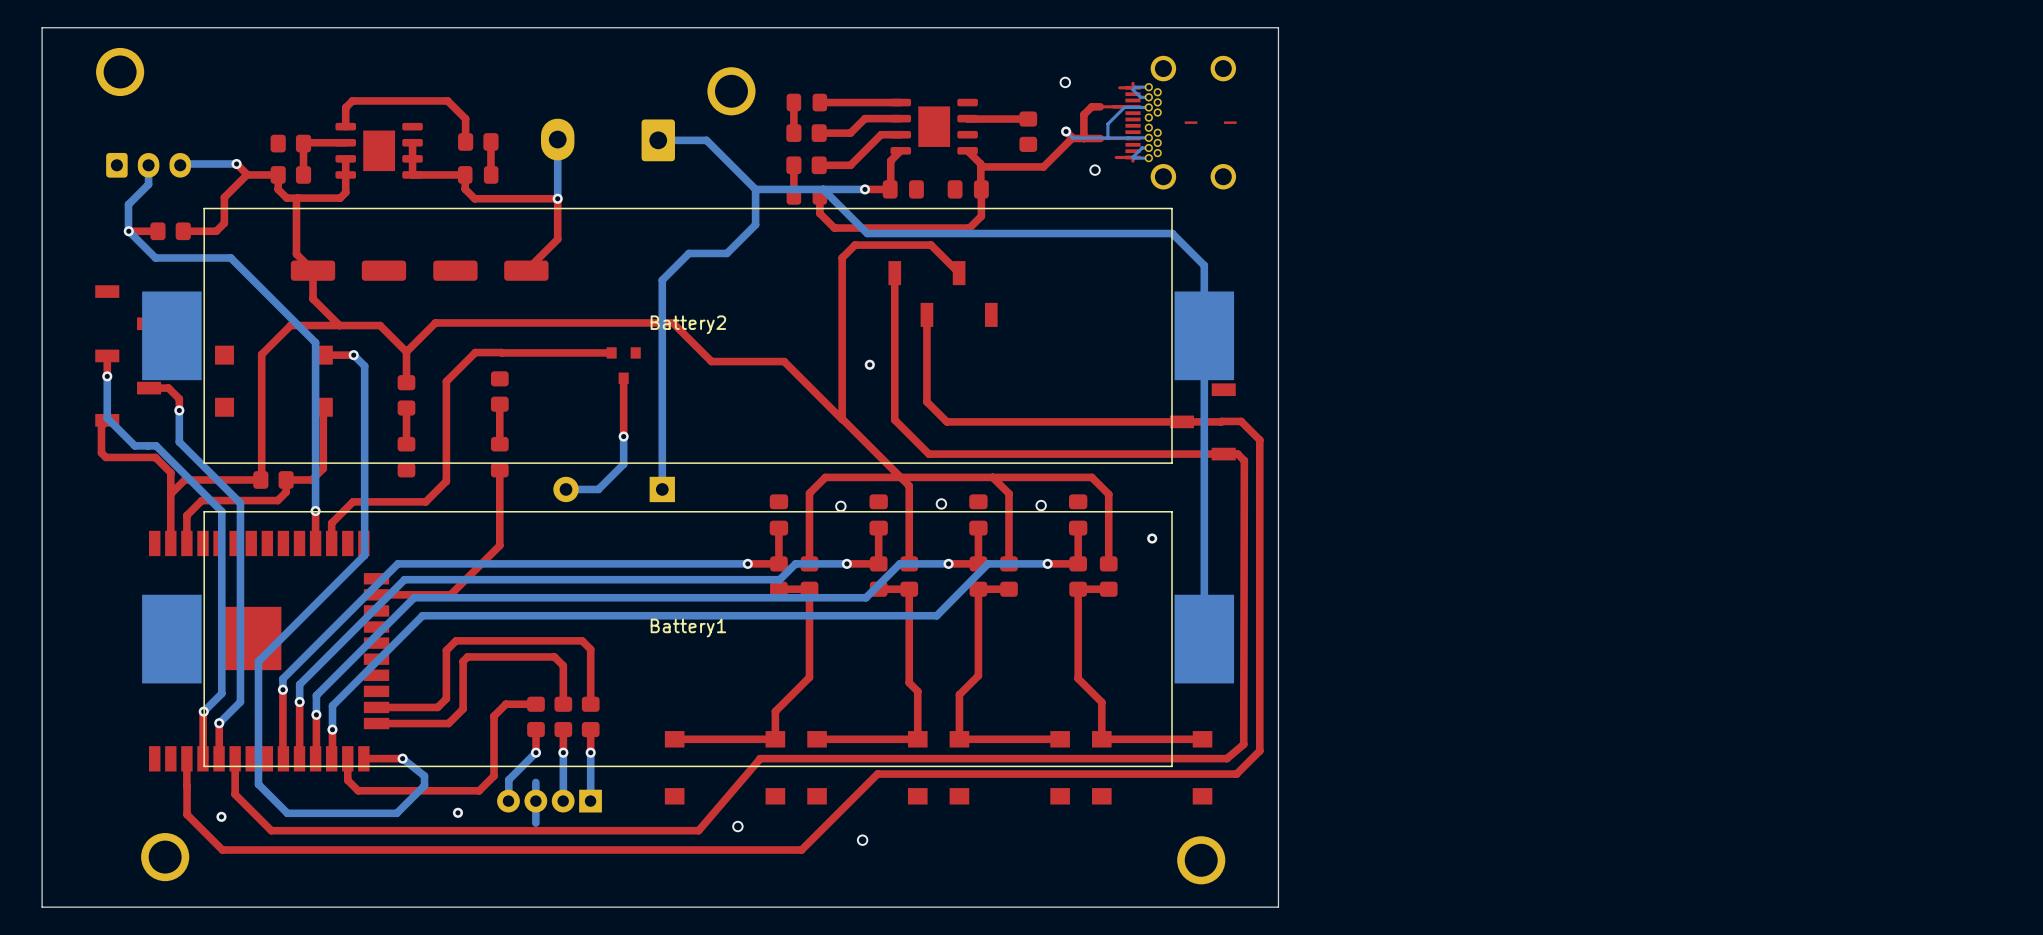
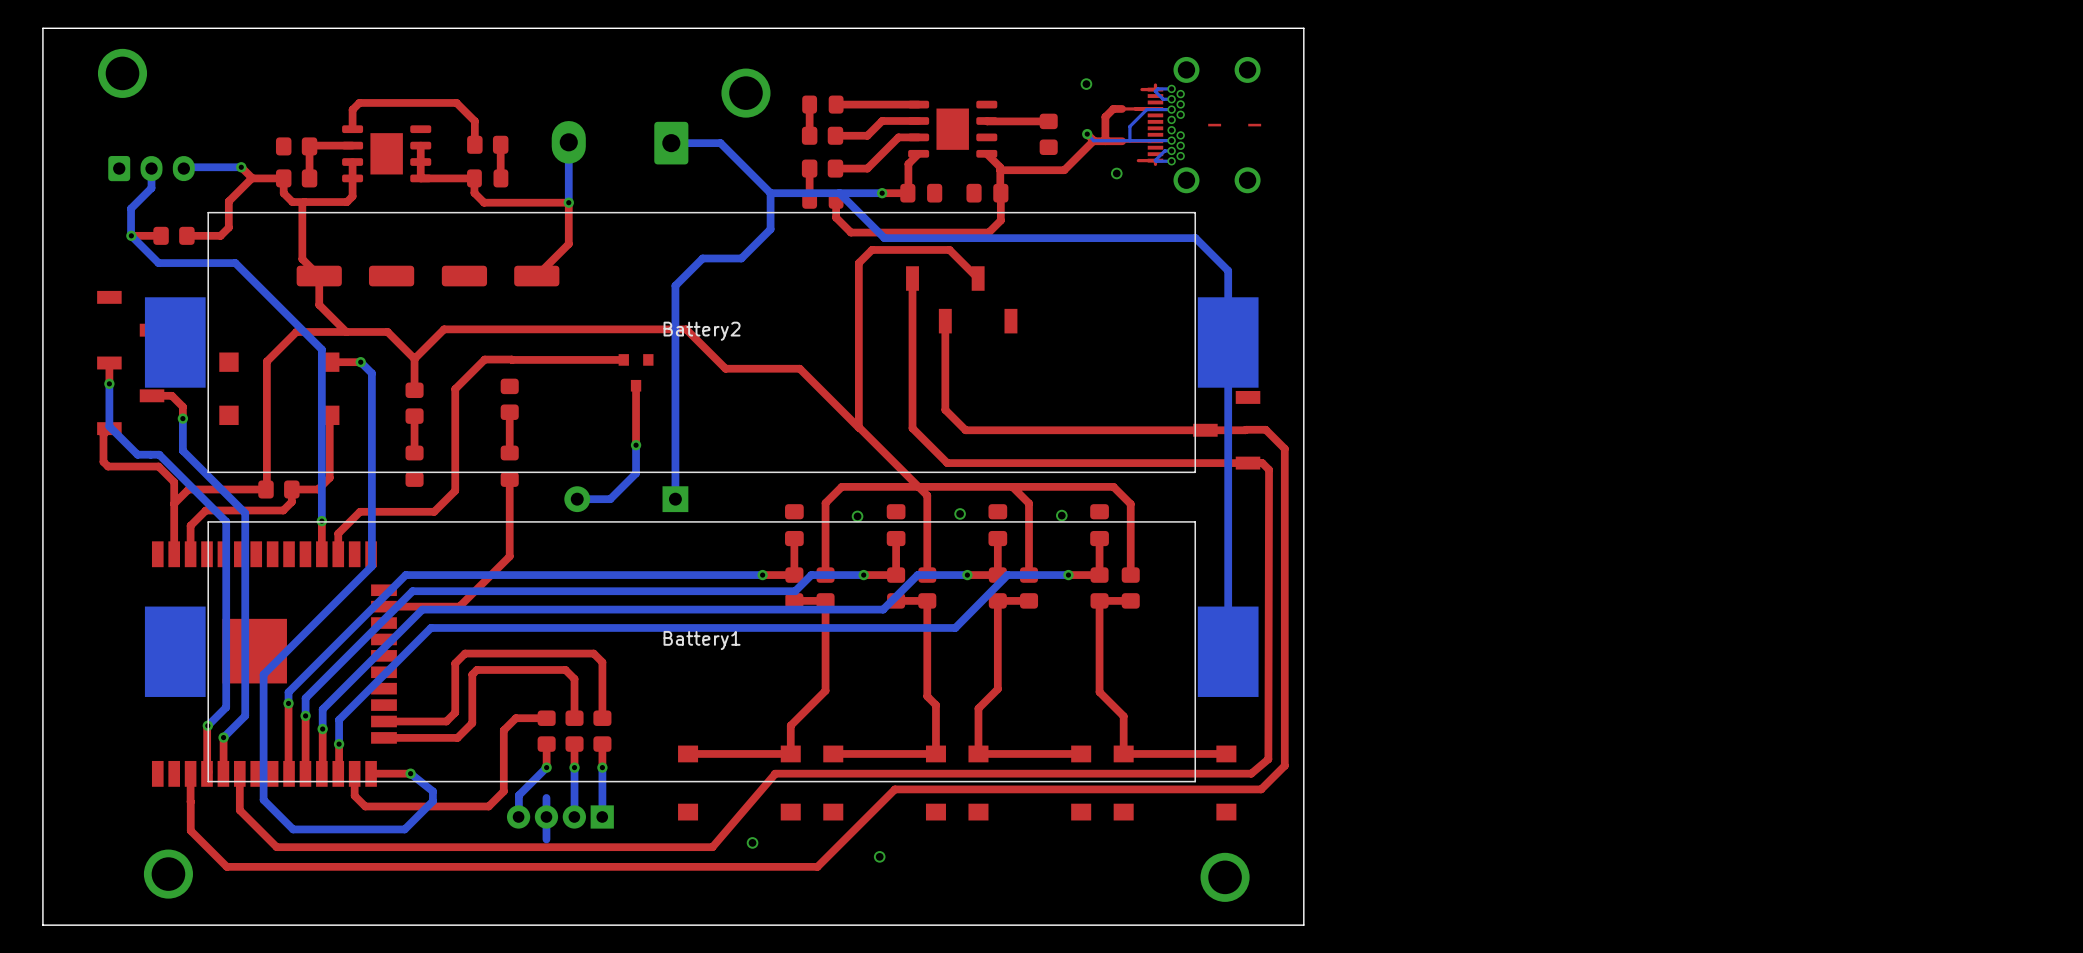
via: (869, 364) -> none
via: (1152, 538) -> none
via: (457, 812) -> none
via: (221, 816) -> none

